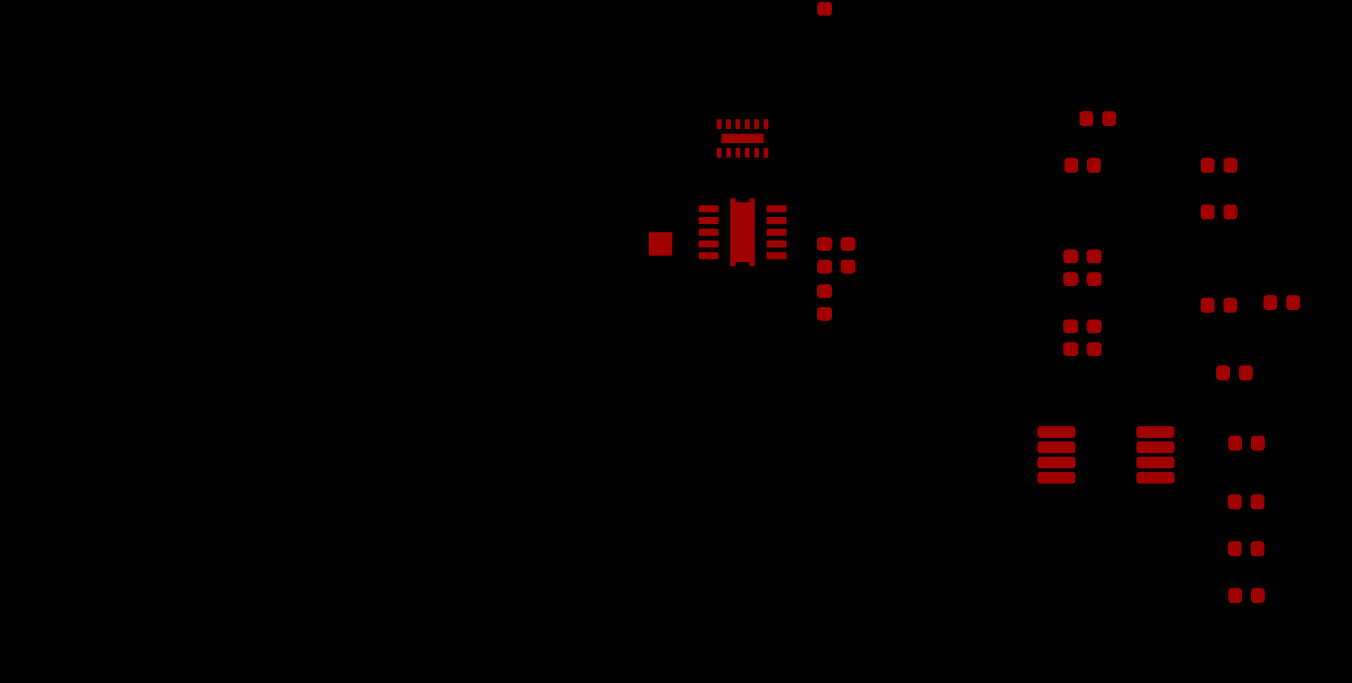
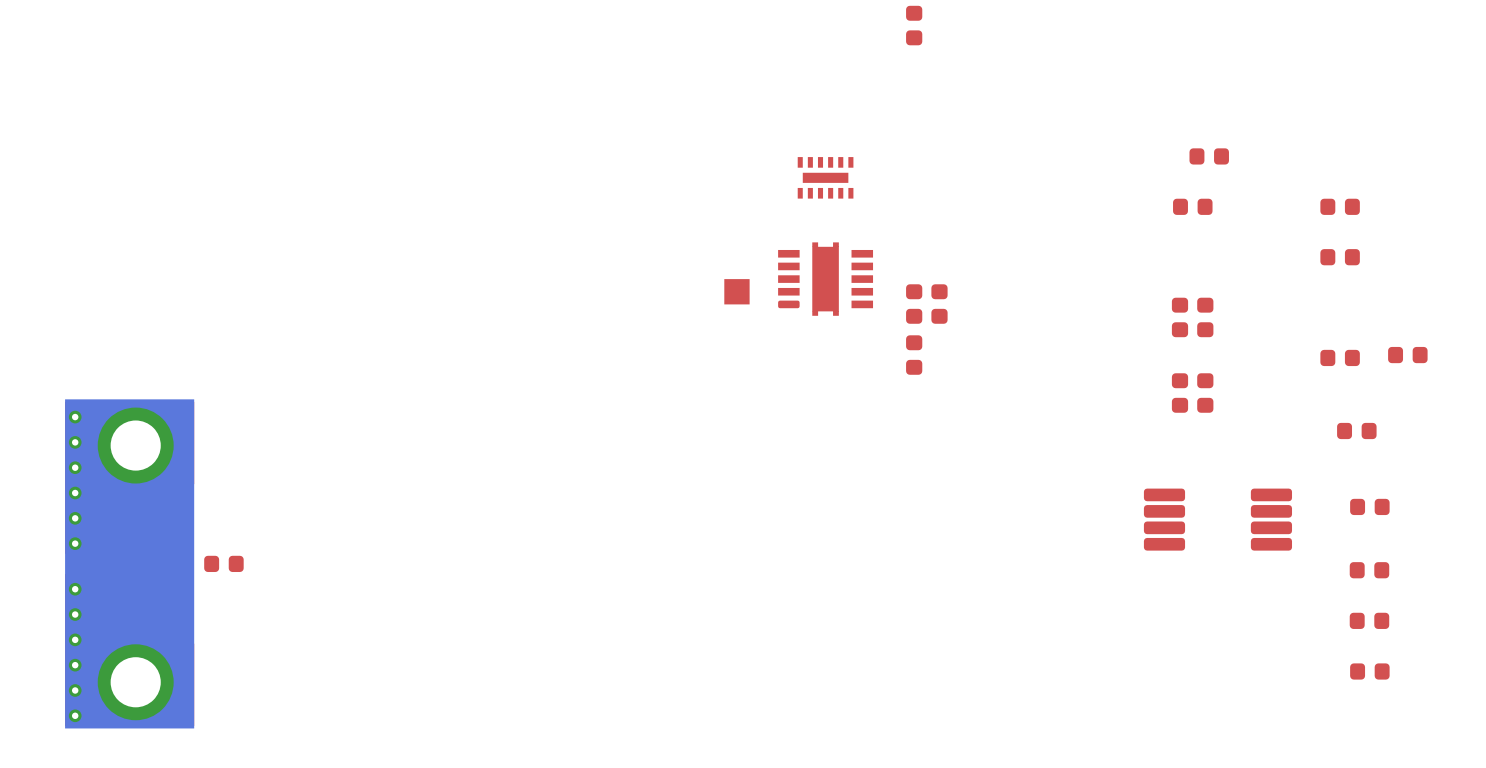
part: none -> (129, 563)
part: none -> (223, 563)

